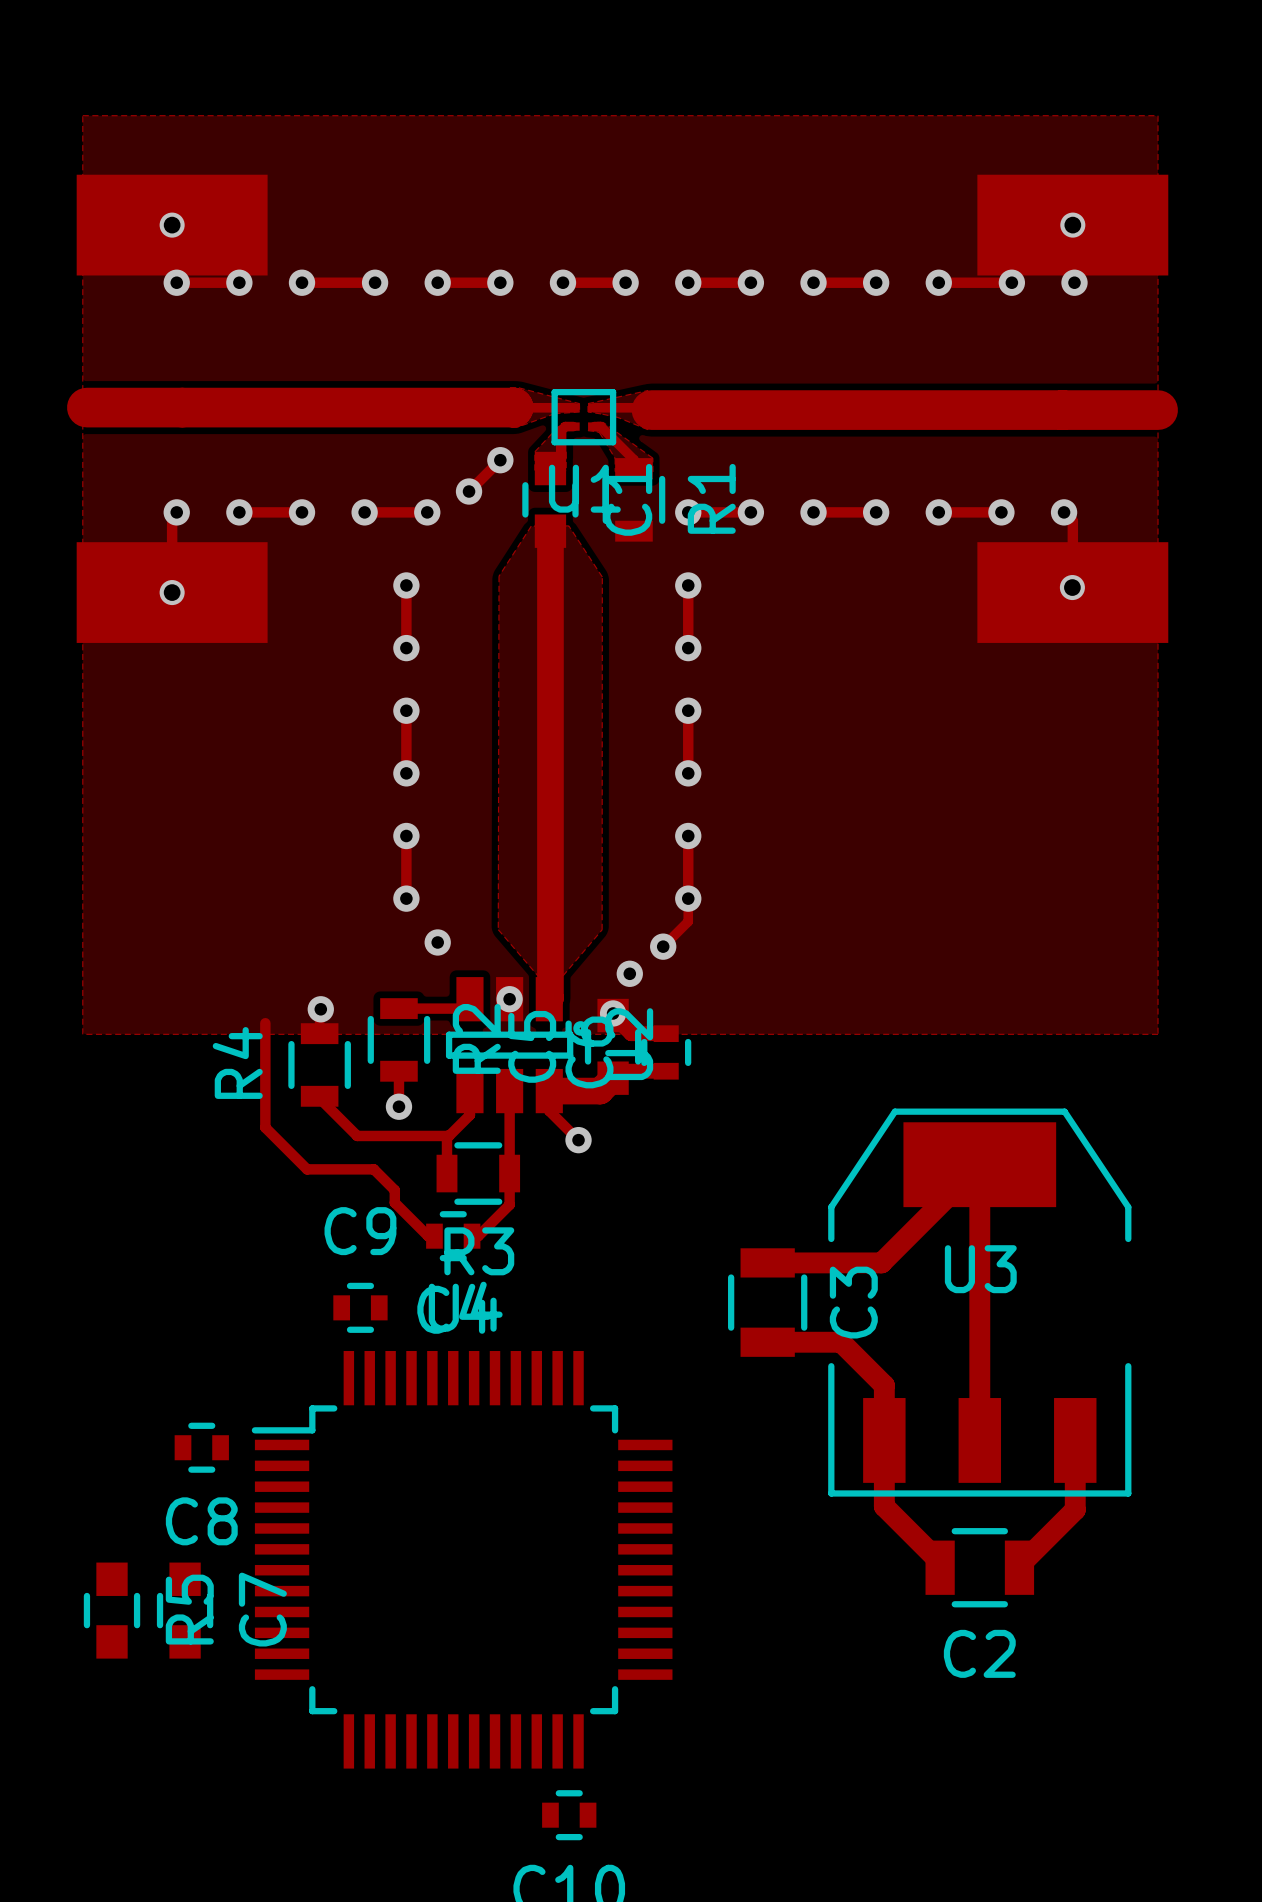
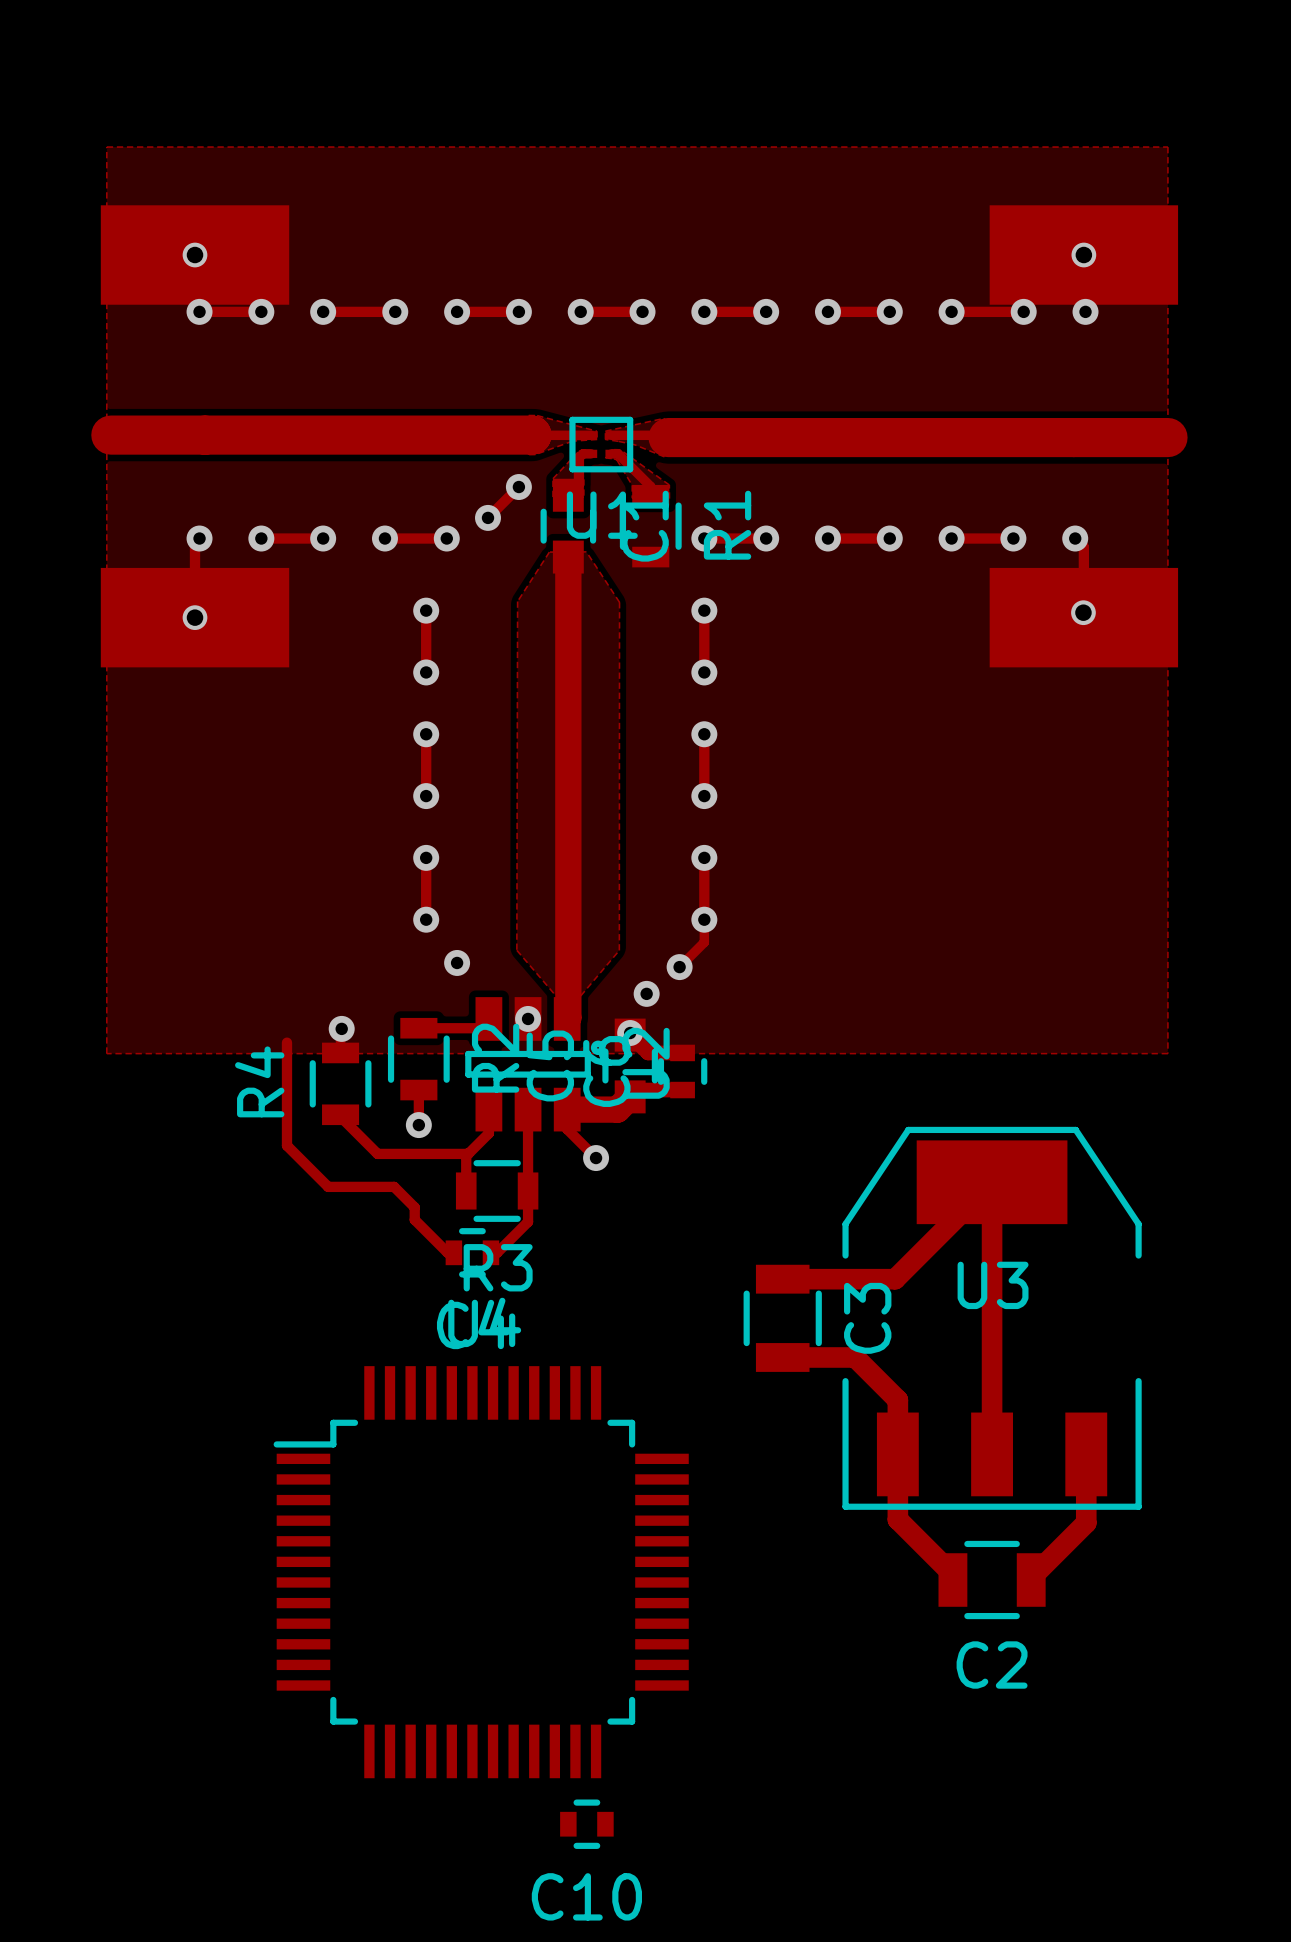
C9: (360, 1307) -> none
C8: (201, 1447) -> none
R5: (112, 1610) -> none
C7: (185, 1610) -> none

